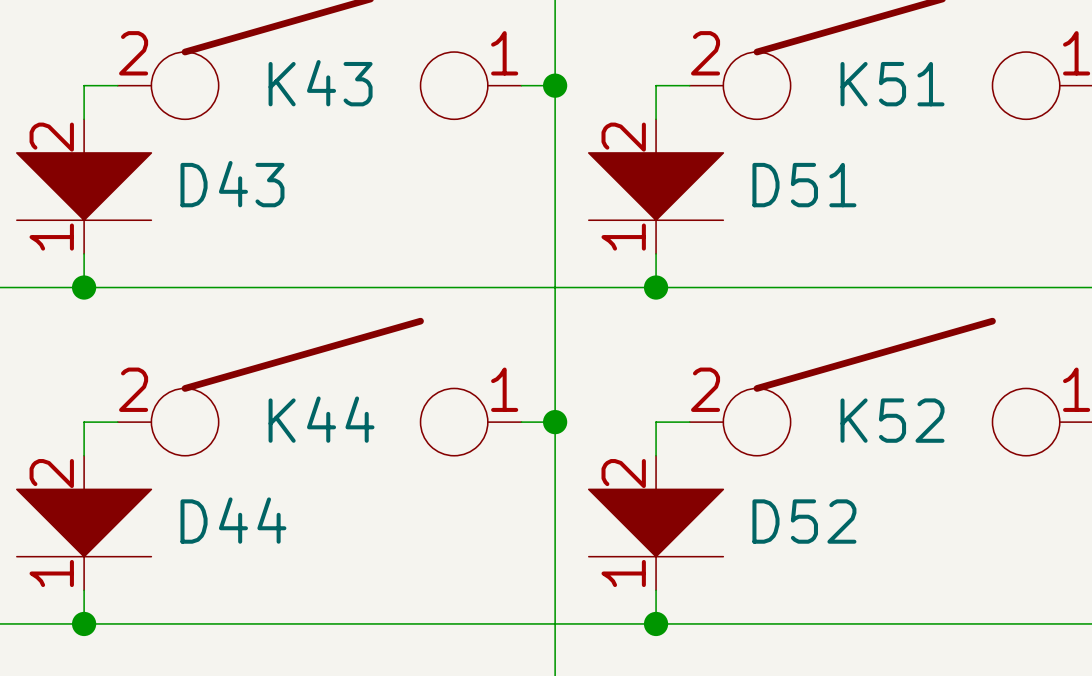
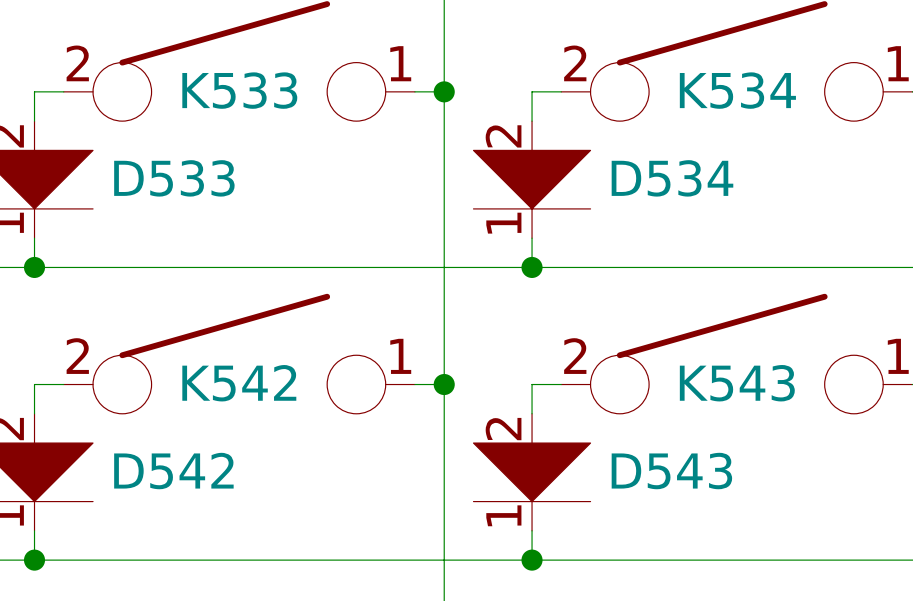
K43 name: K43 (320, 83) -> K533 (239, 90)
K51 name: K51 (892, 84) -> K534 (737, 90)
D43 name: D43 (232, 184) -> D533 (174, 178)
D51 name: D51 (804, 185) -> D534 (672, 178)
K44 name: K44 (321, 419) -> K542 (239, 383)
K52 name: K52 (892, 420) -> K543 (737, 383)
D44 name: D44 (233, 520) -> D542 (173, 471)
D52 name: D52 (804, 521) -> D543 (671, 471)

